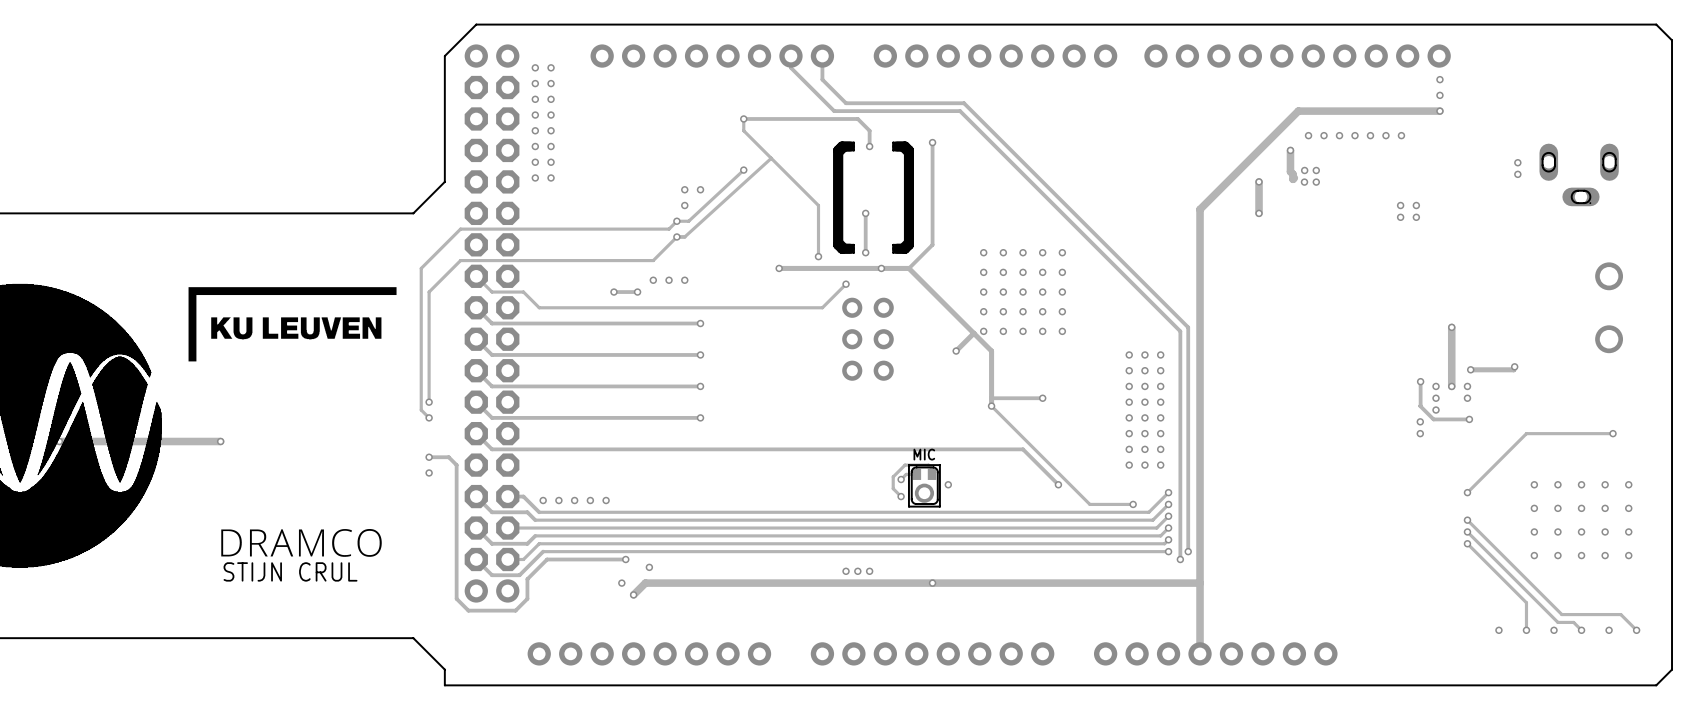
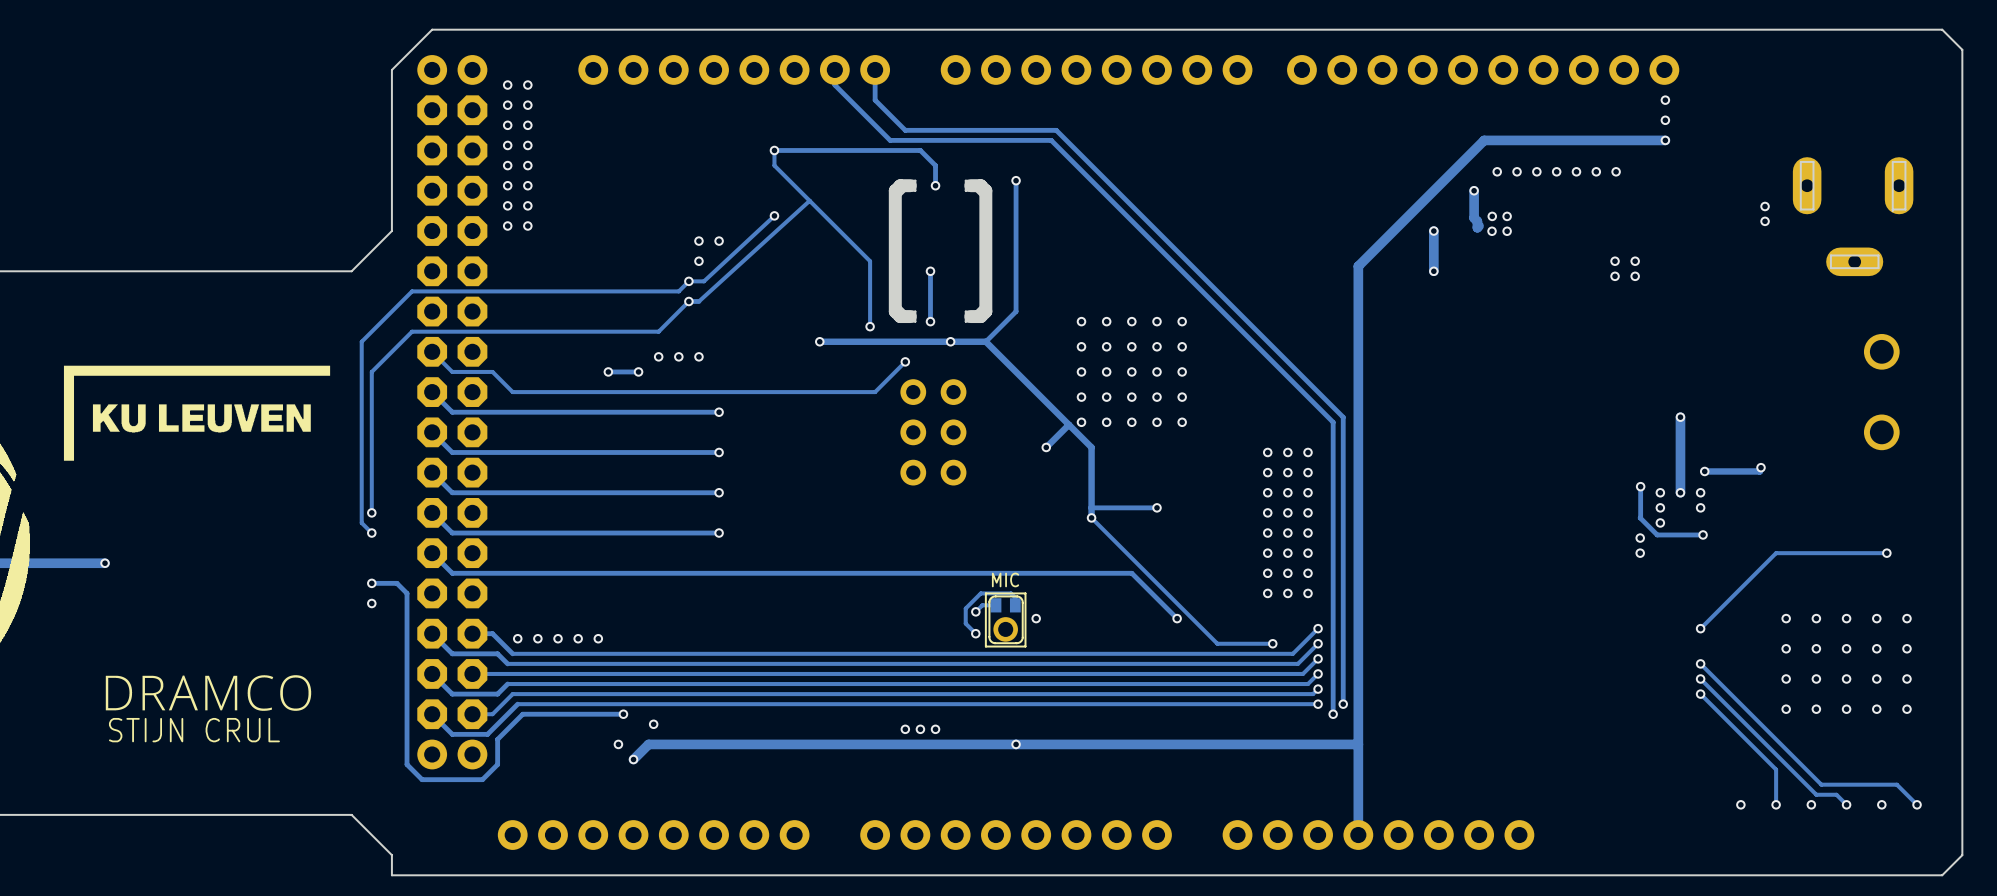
part footprint: [1539, 143, 1619, 207] -> [1792, 157, 1914, 277]

